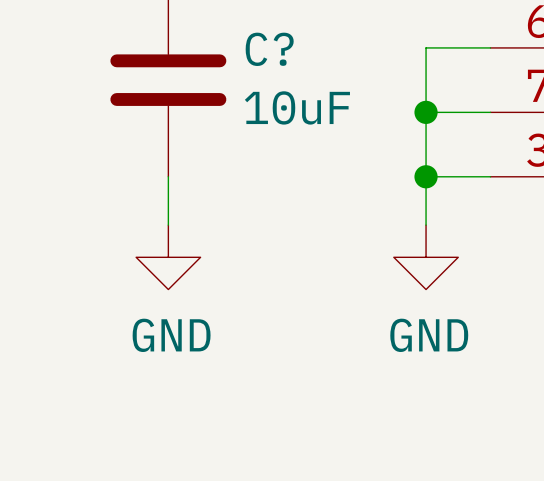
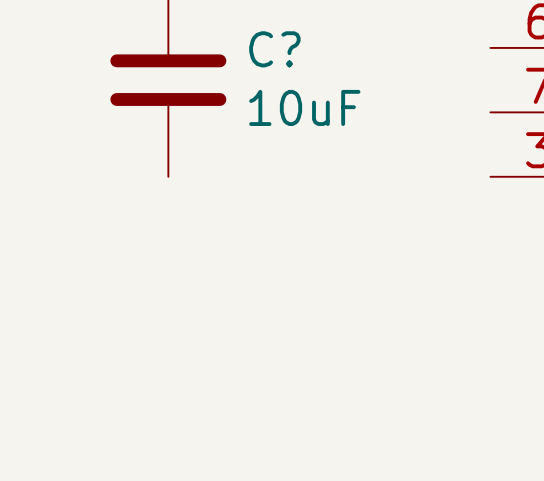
wire: (490, 47) (426, 47) (426, 225) -> none
wire: (426, 112) (490, 112) -> none
junction: (426, 112) -> none
wire: (168, 176) (168, 225) -> none
wire: (426, 176) (490, 176) -> none
junction: (426, 176) -> none
power symbol: GND (168, 257) -> none
power symbol: GND (426, 257) -> none

